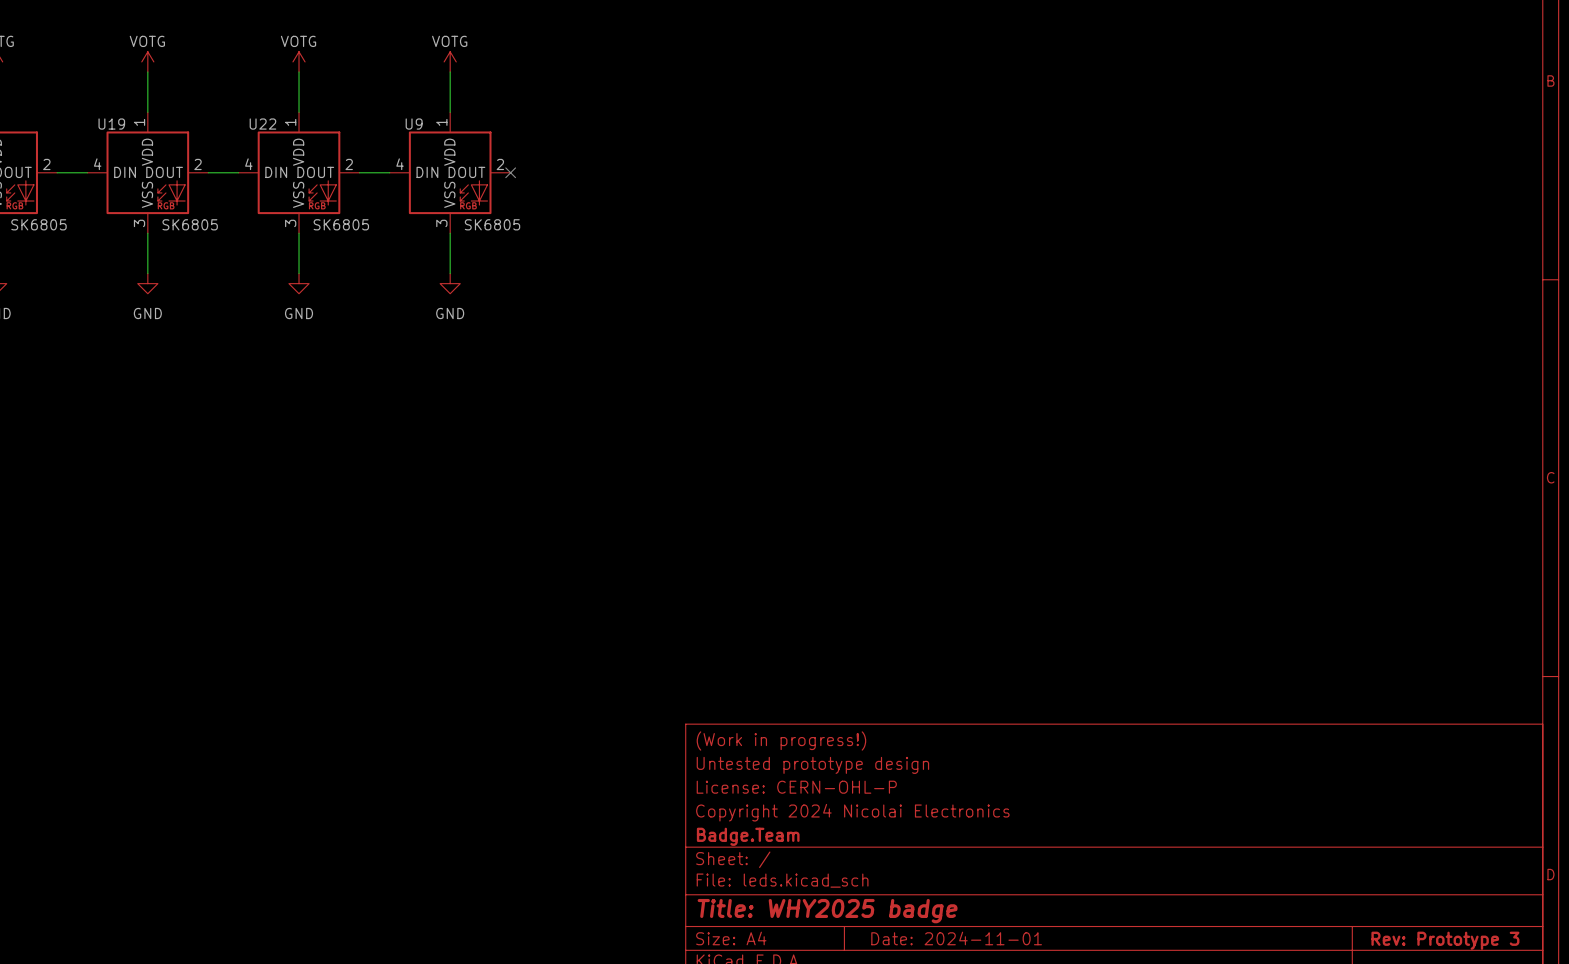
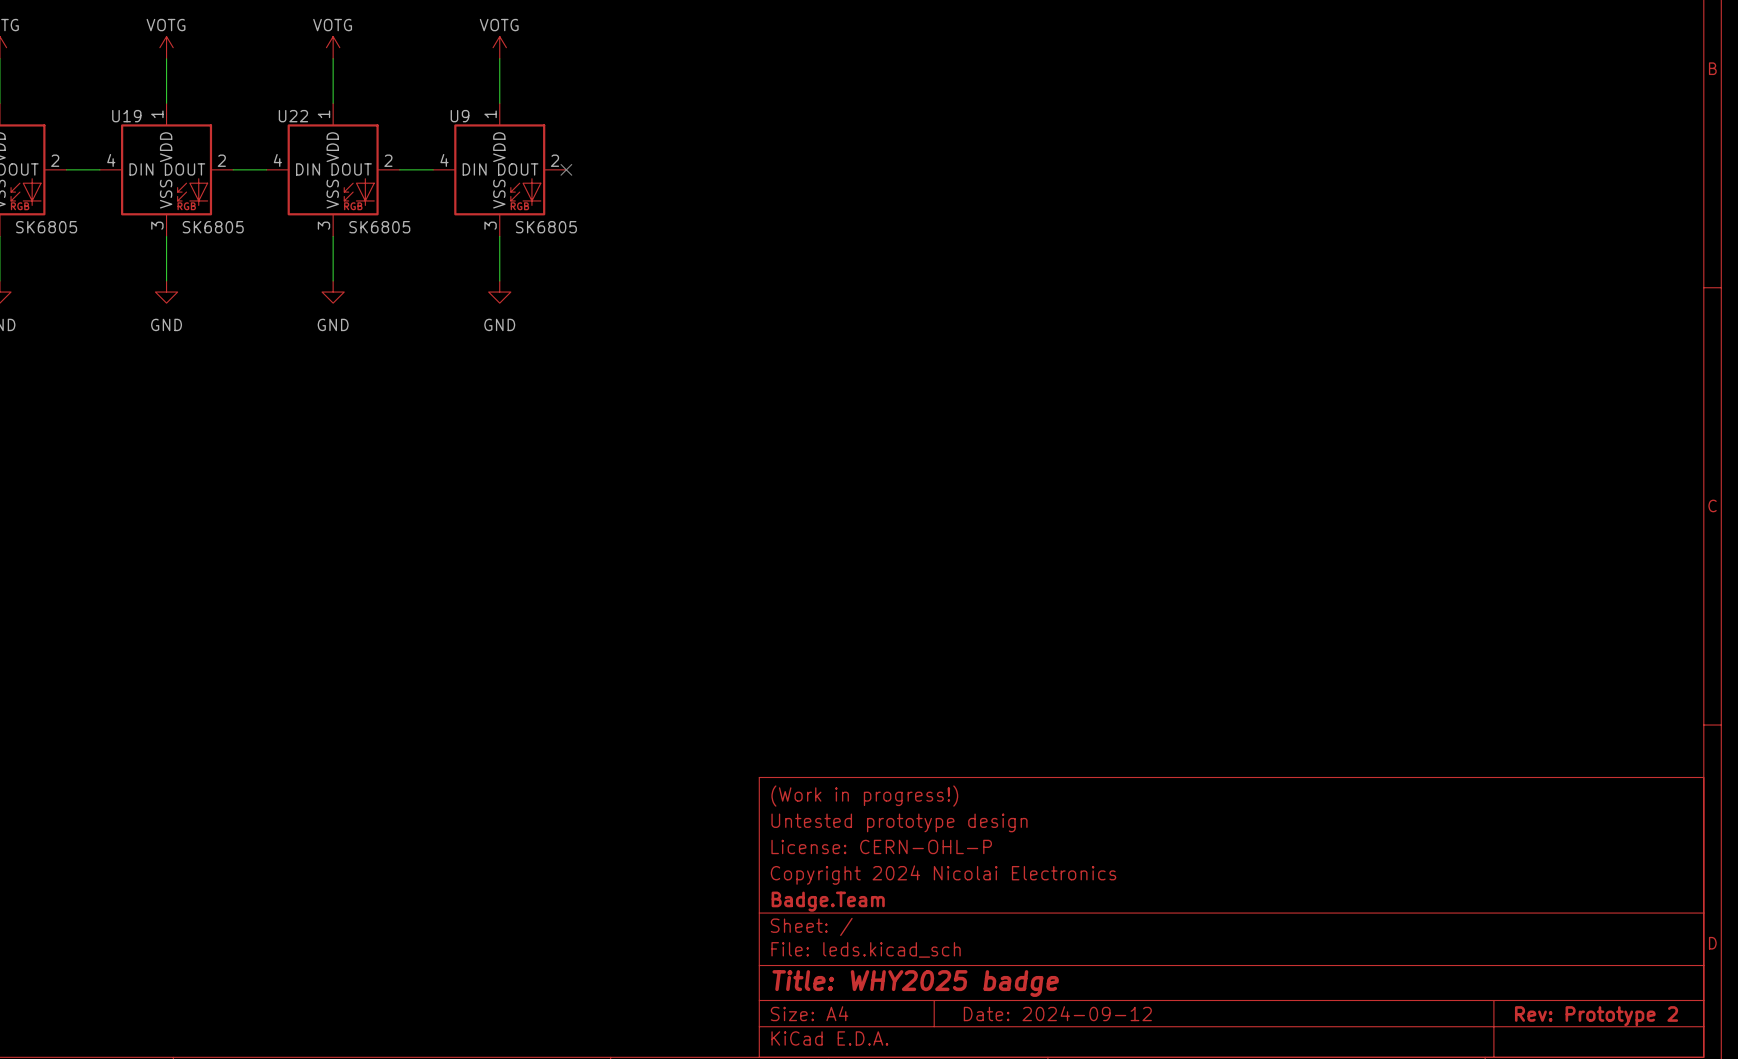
title block: Date: 2024-11-01 (956, 938) -> Date: 2024-09-12 (1057, 1013)
title block: Rev: Prototype 3 (1445, 940) -> Rev: Prototype 2 (1596, 1016)

